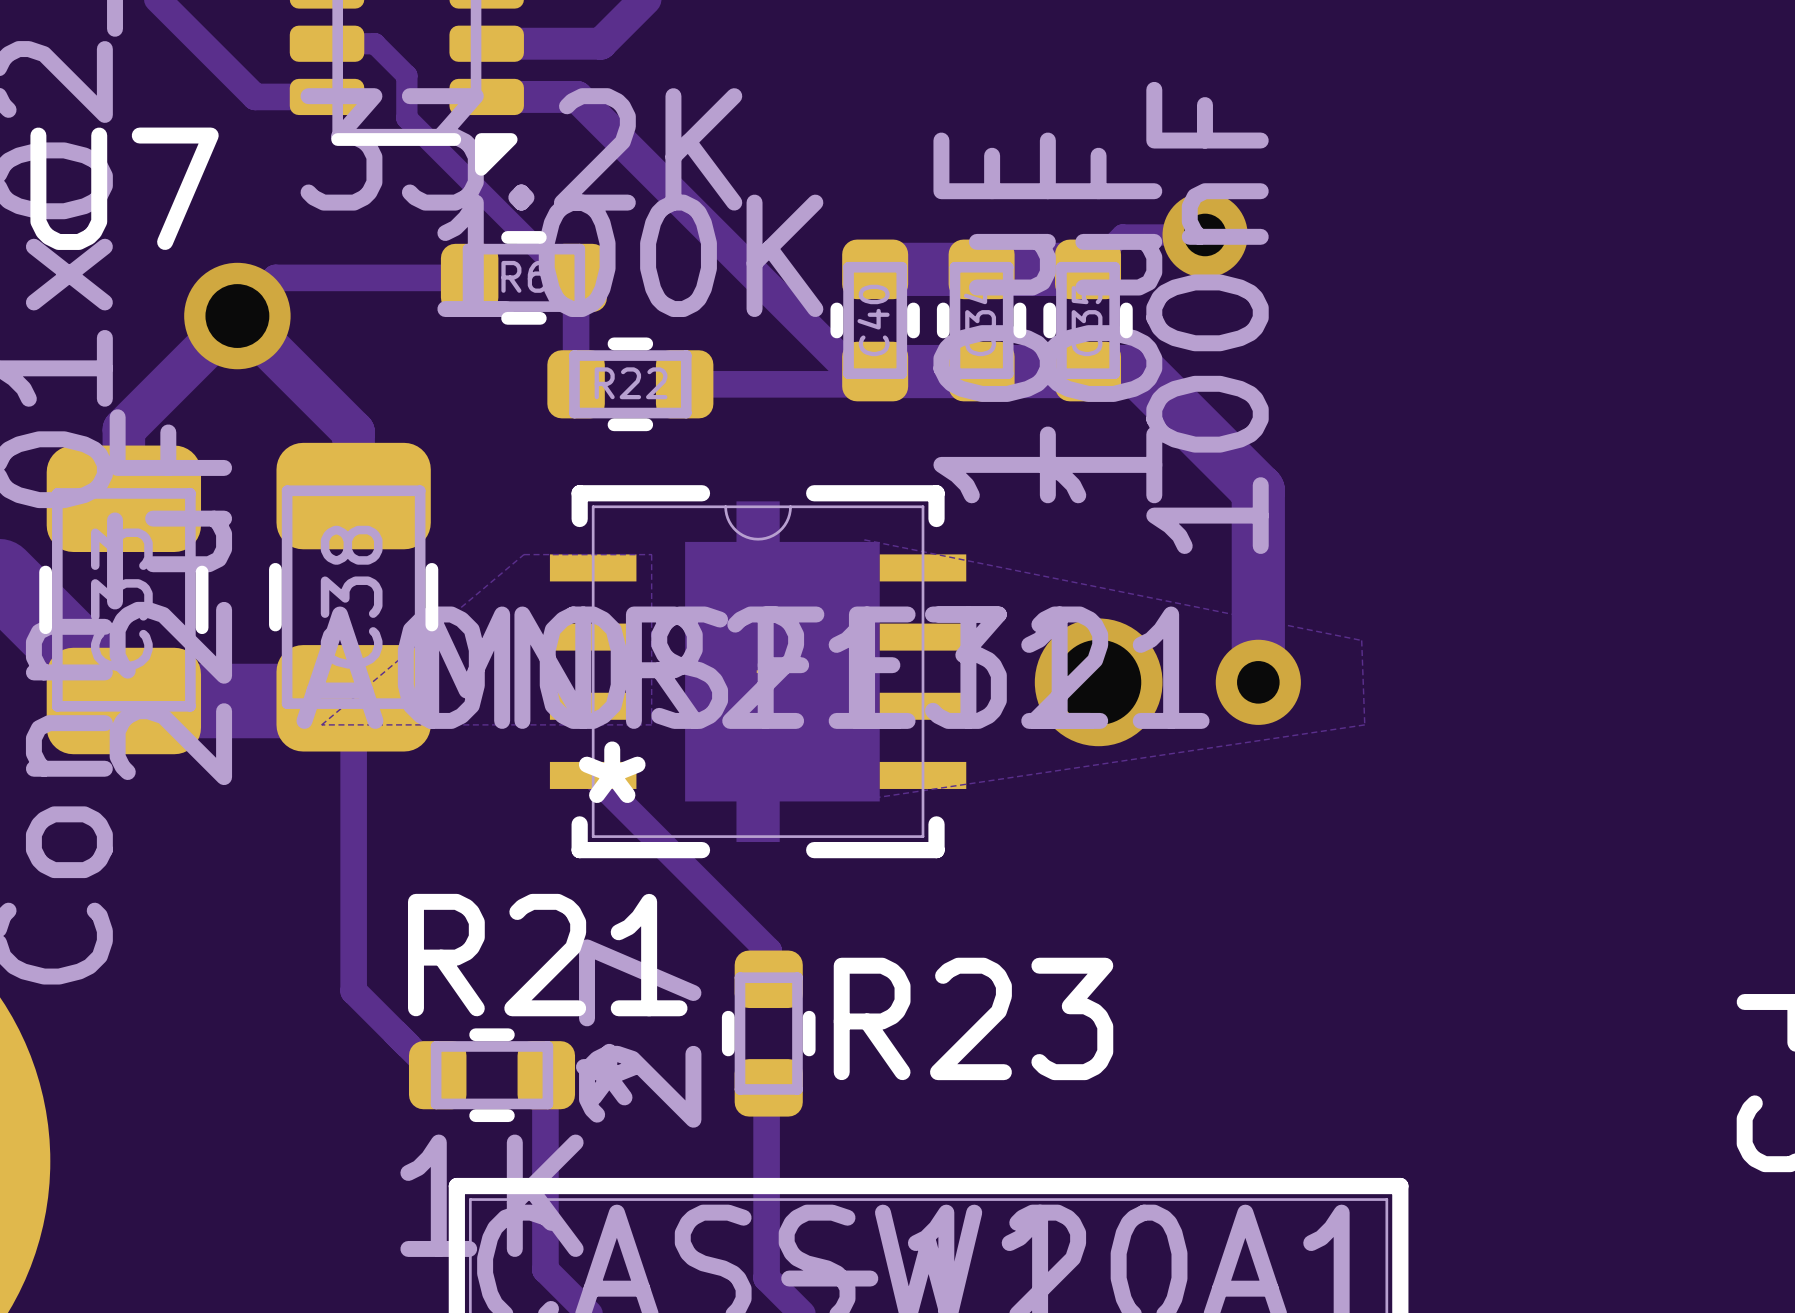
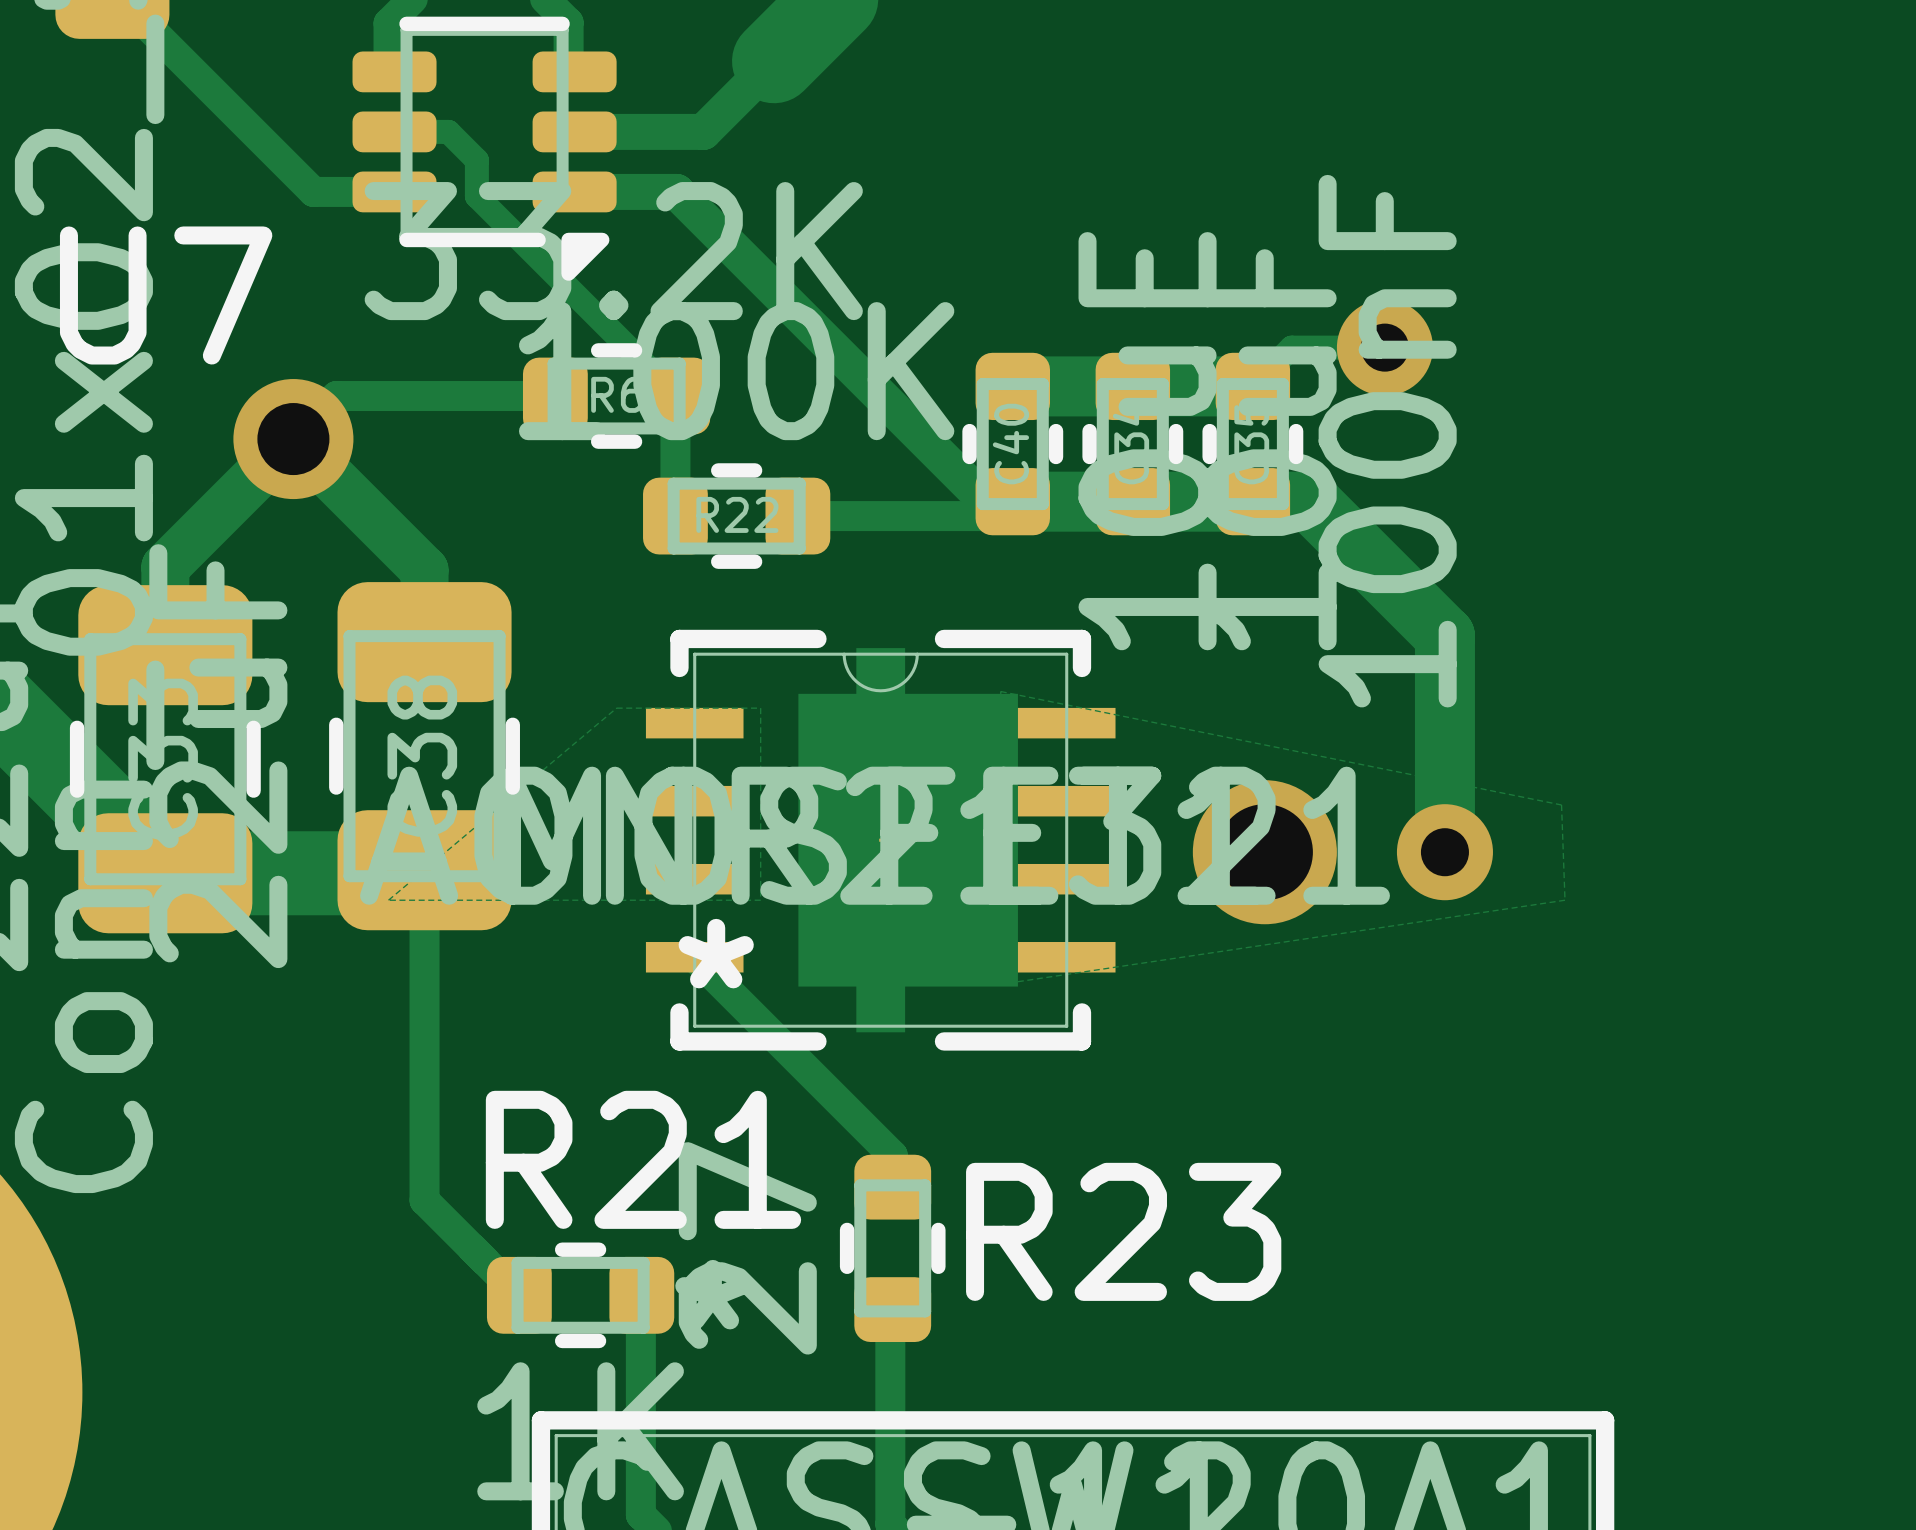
track: (400, 68) (406, 75) (406, 118) (566, 277) -> (476, 160) (476, 196) (664, 384) (677, 384) (675, 386) (675, 398)

